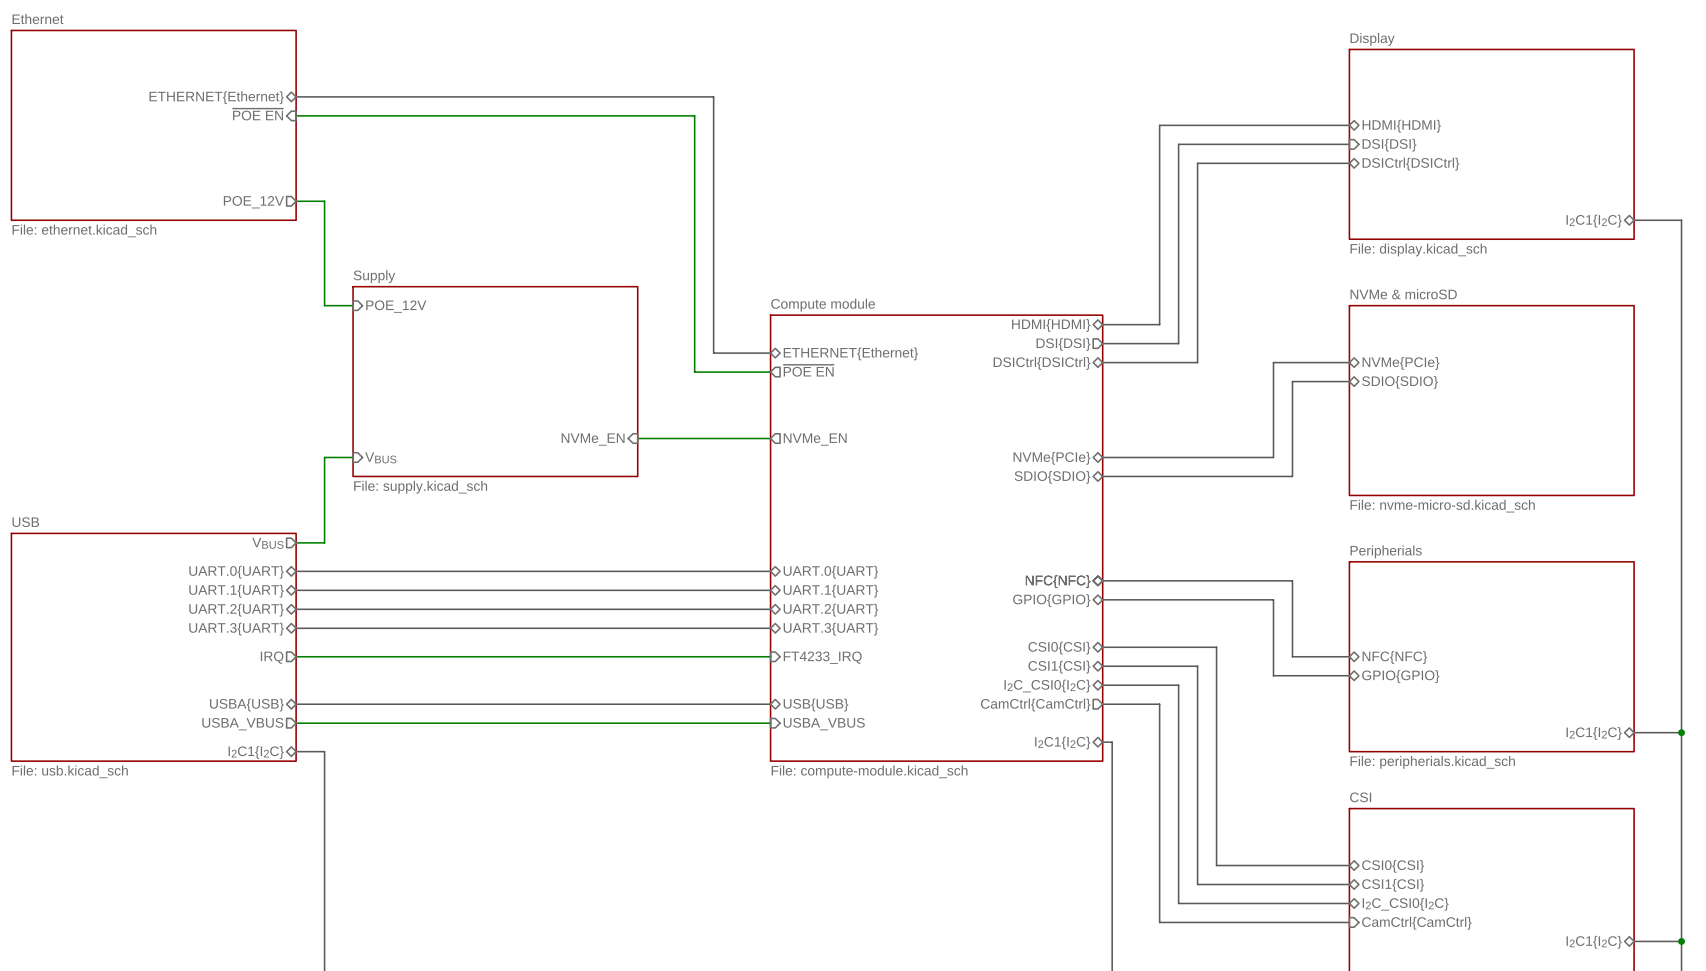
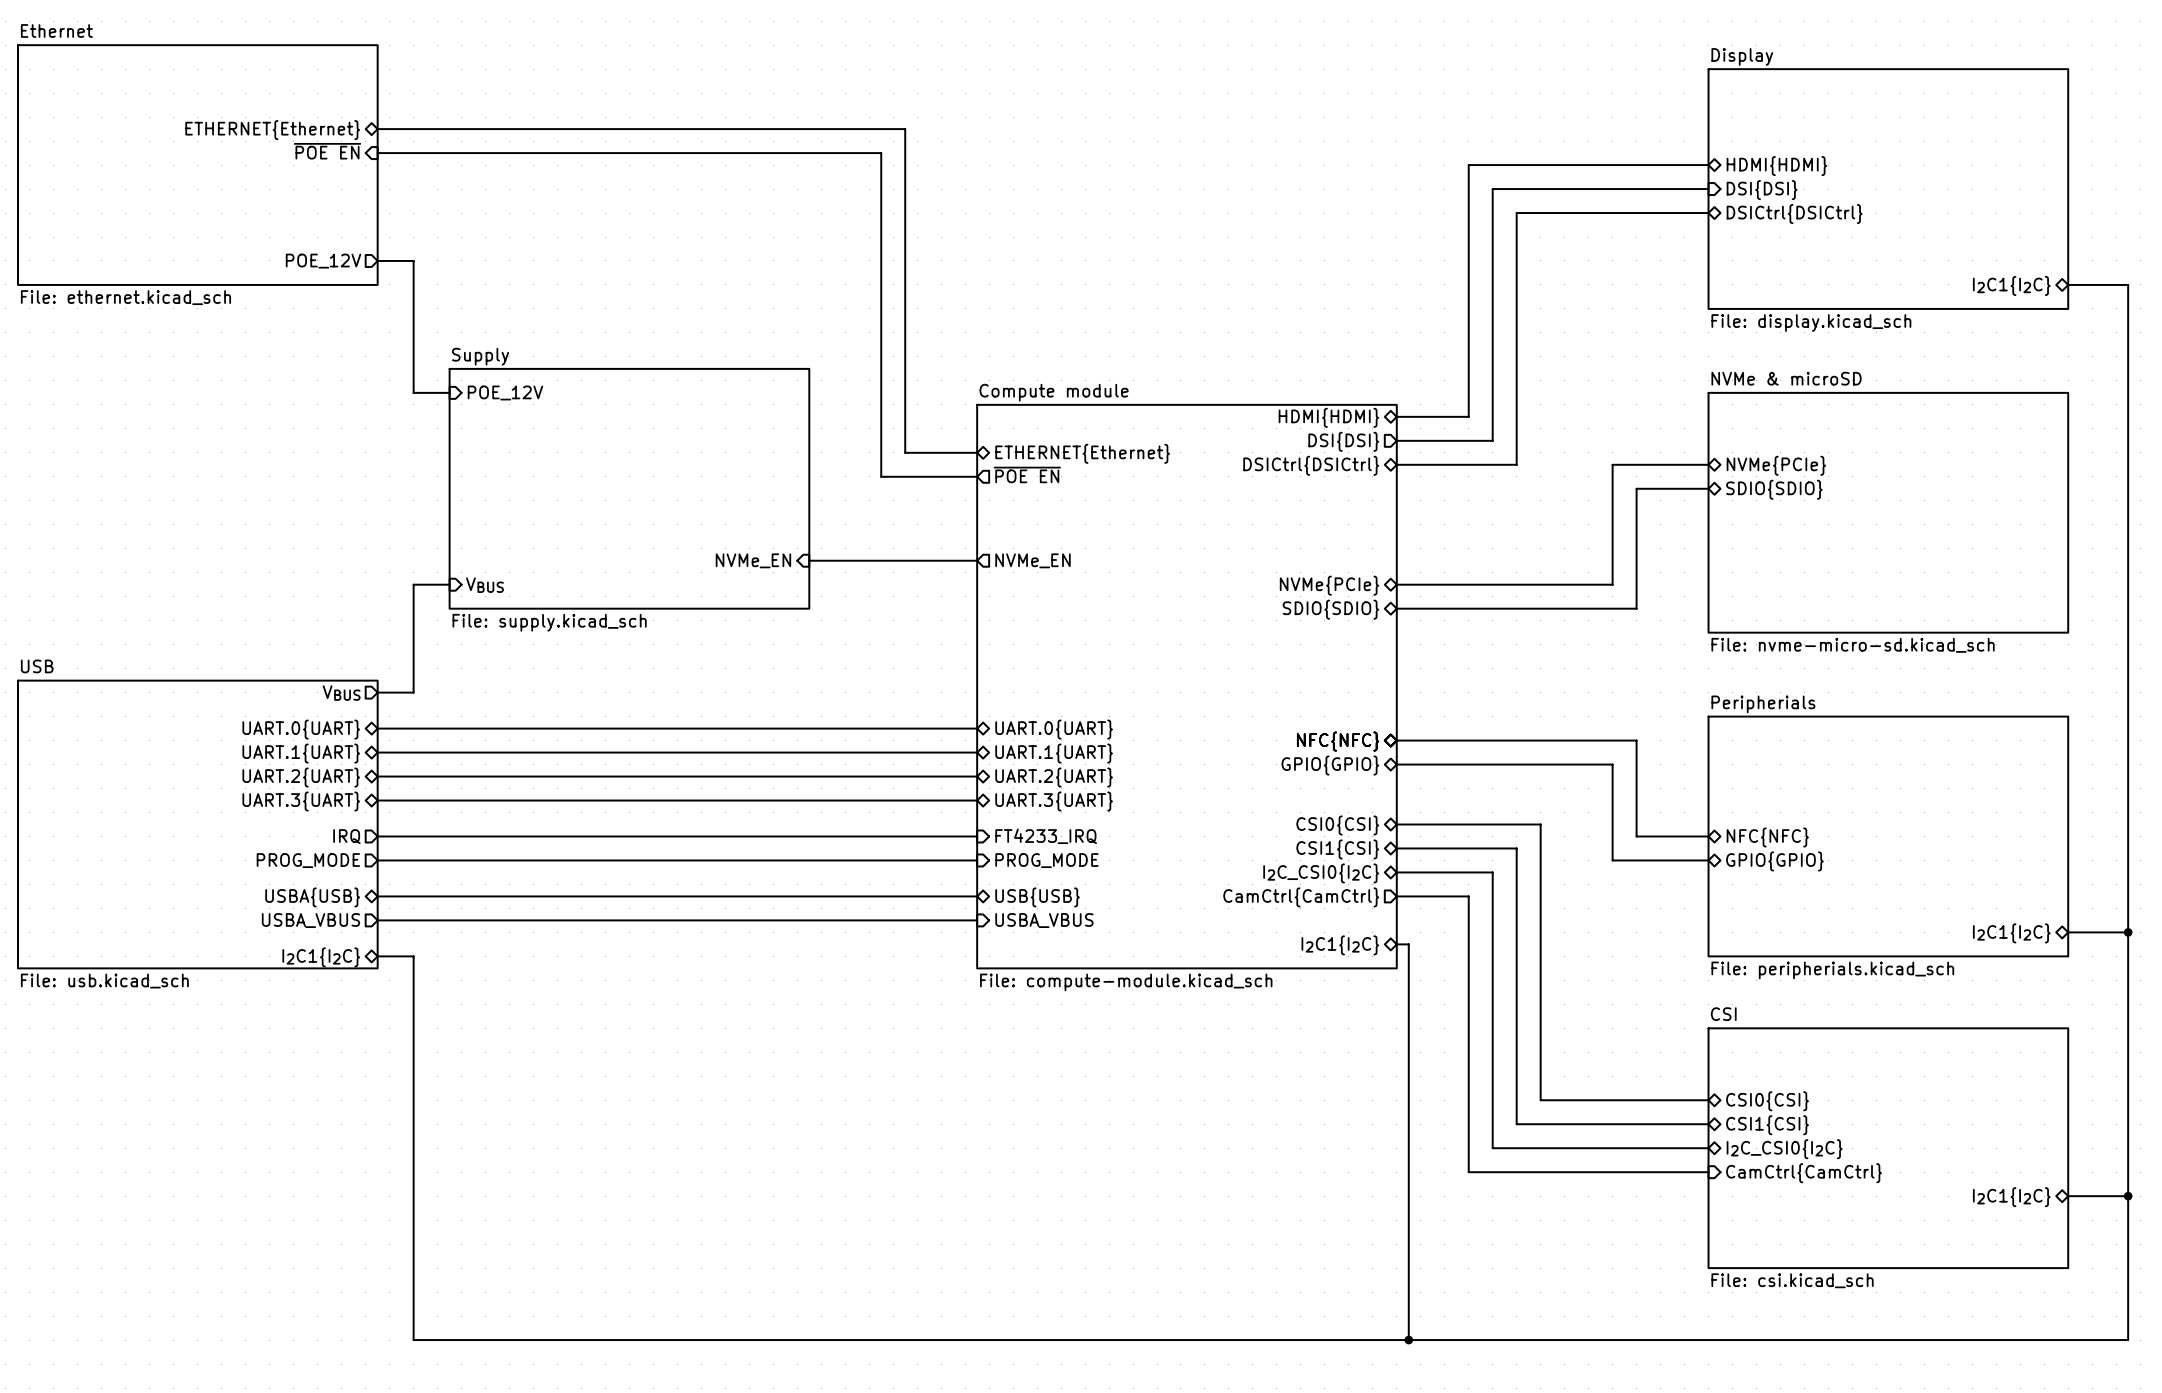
wire: none -> (377, 860) (977, 860)
sheet pin: none -> PROG_MODE (308, 860)
sheet pin: none -> PROG_MODE (1046, 860)

